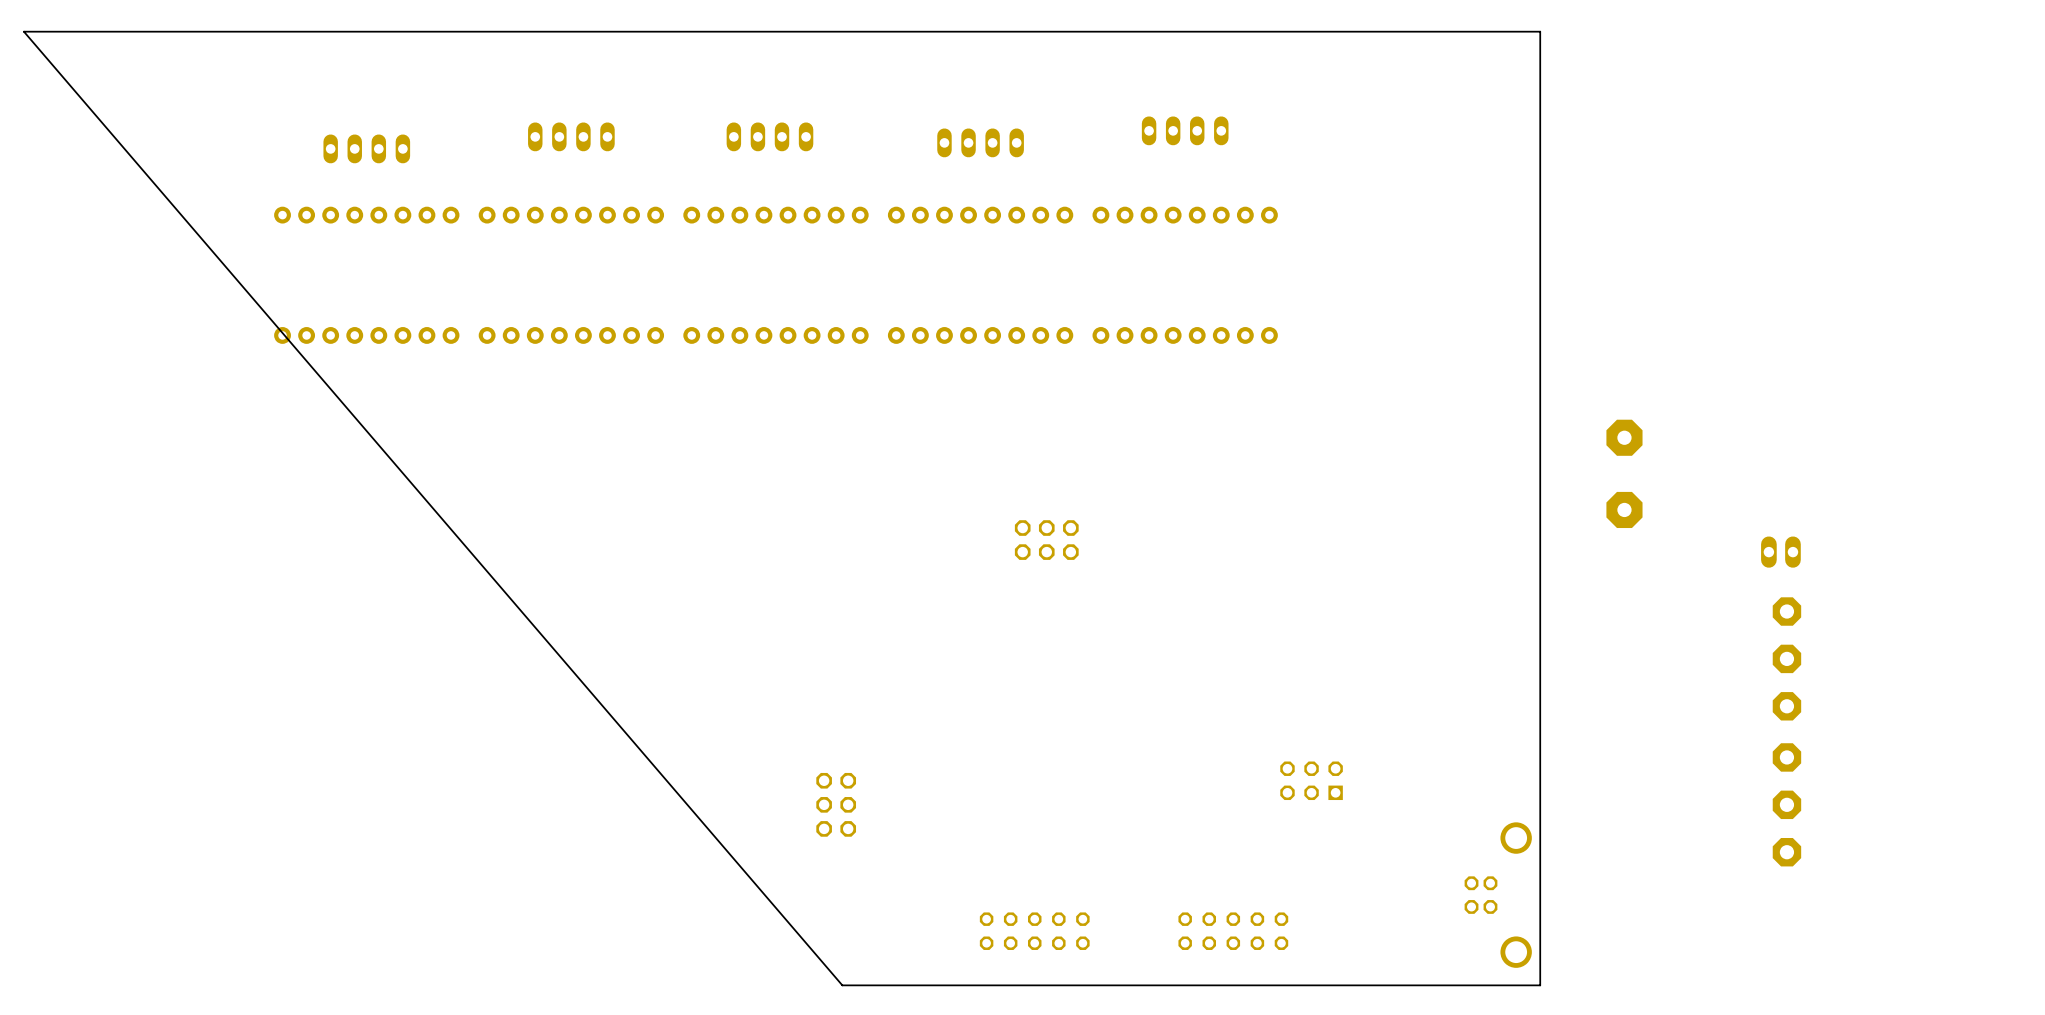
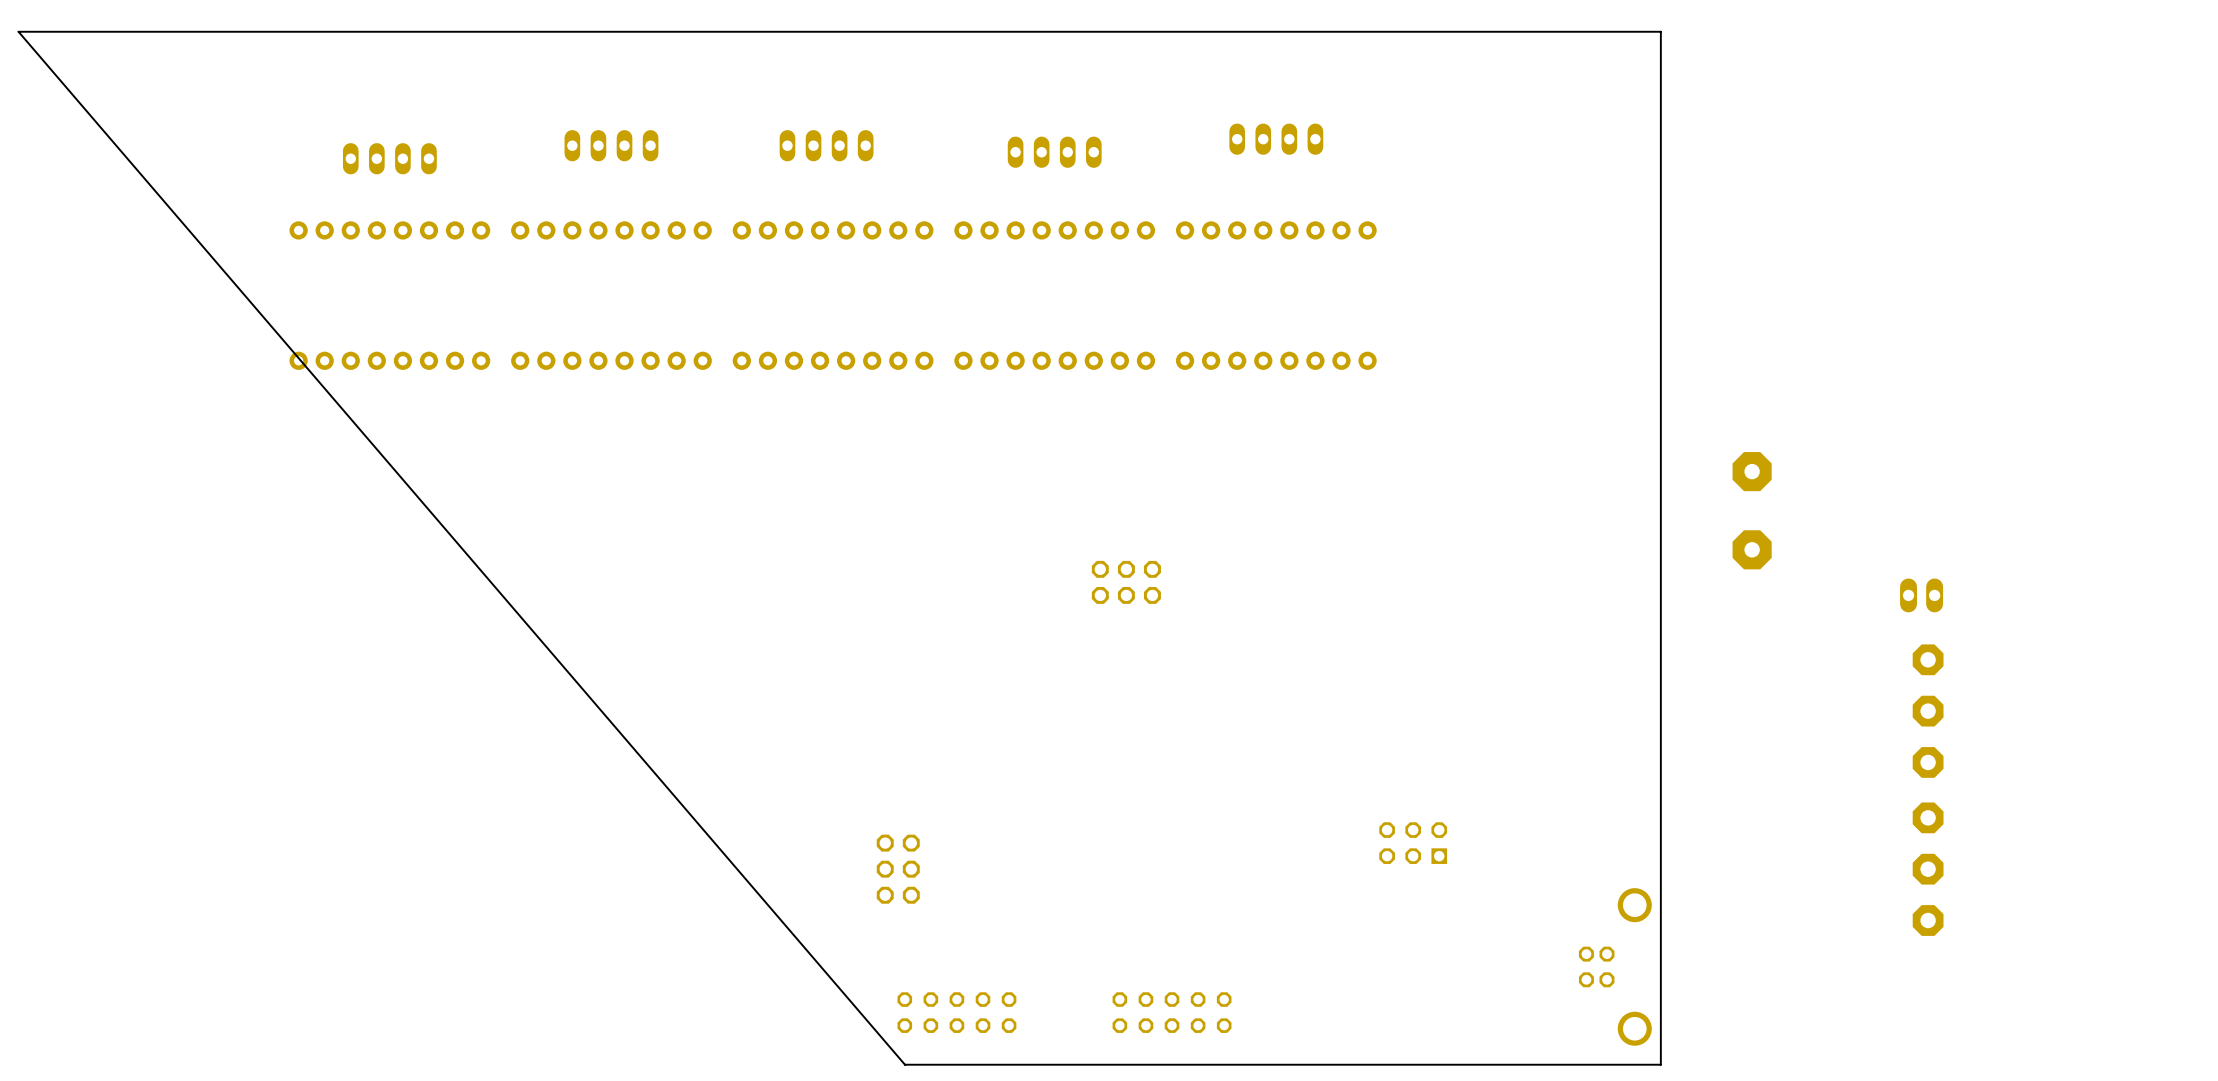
part position: (1034, 931) -> (1172, 1012)
part: (1233, 931) -> none
part: none -> (956, 1012)

